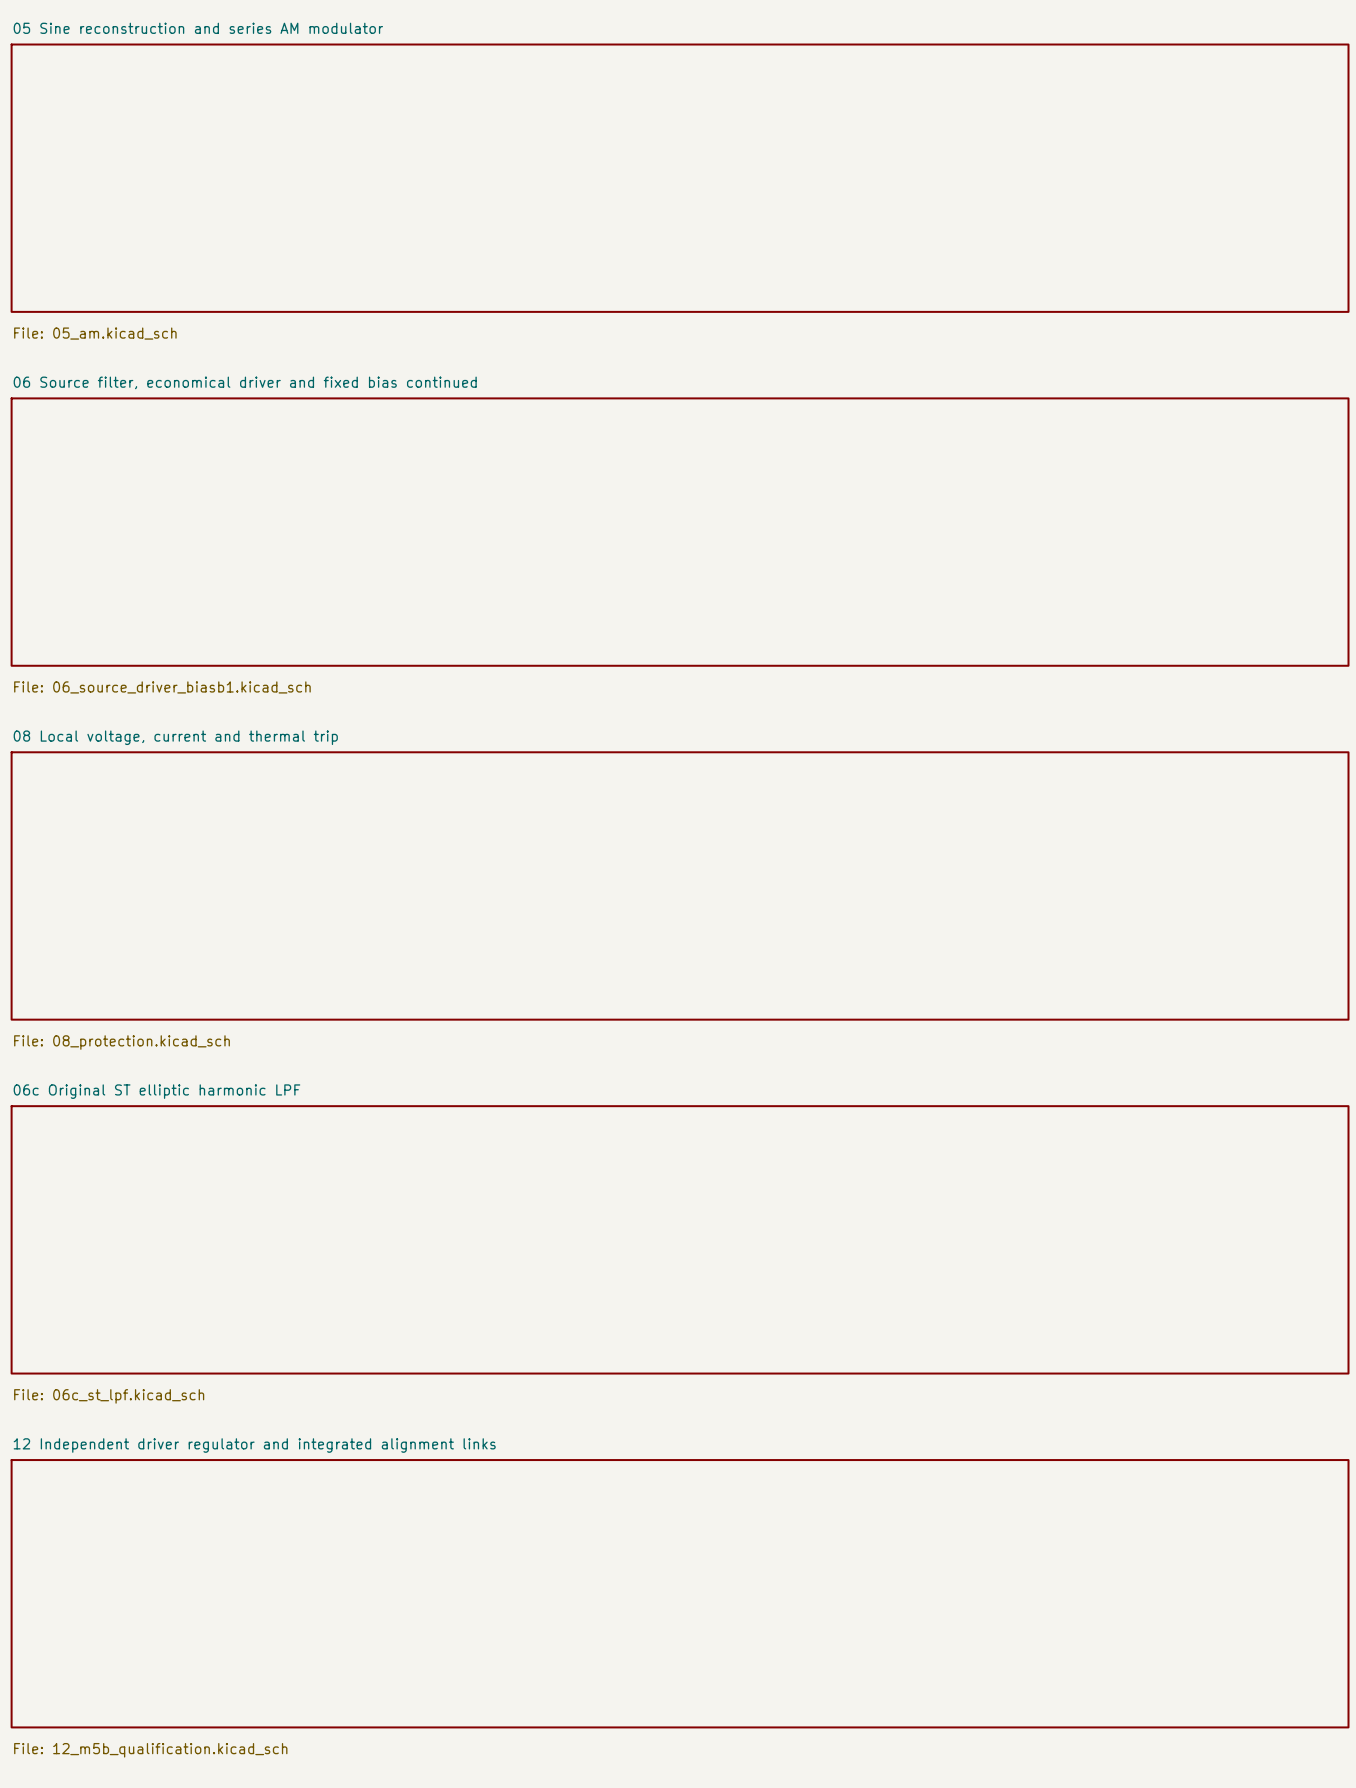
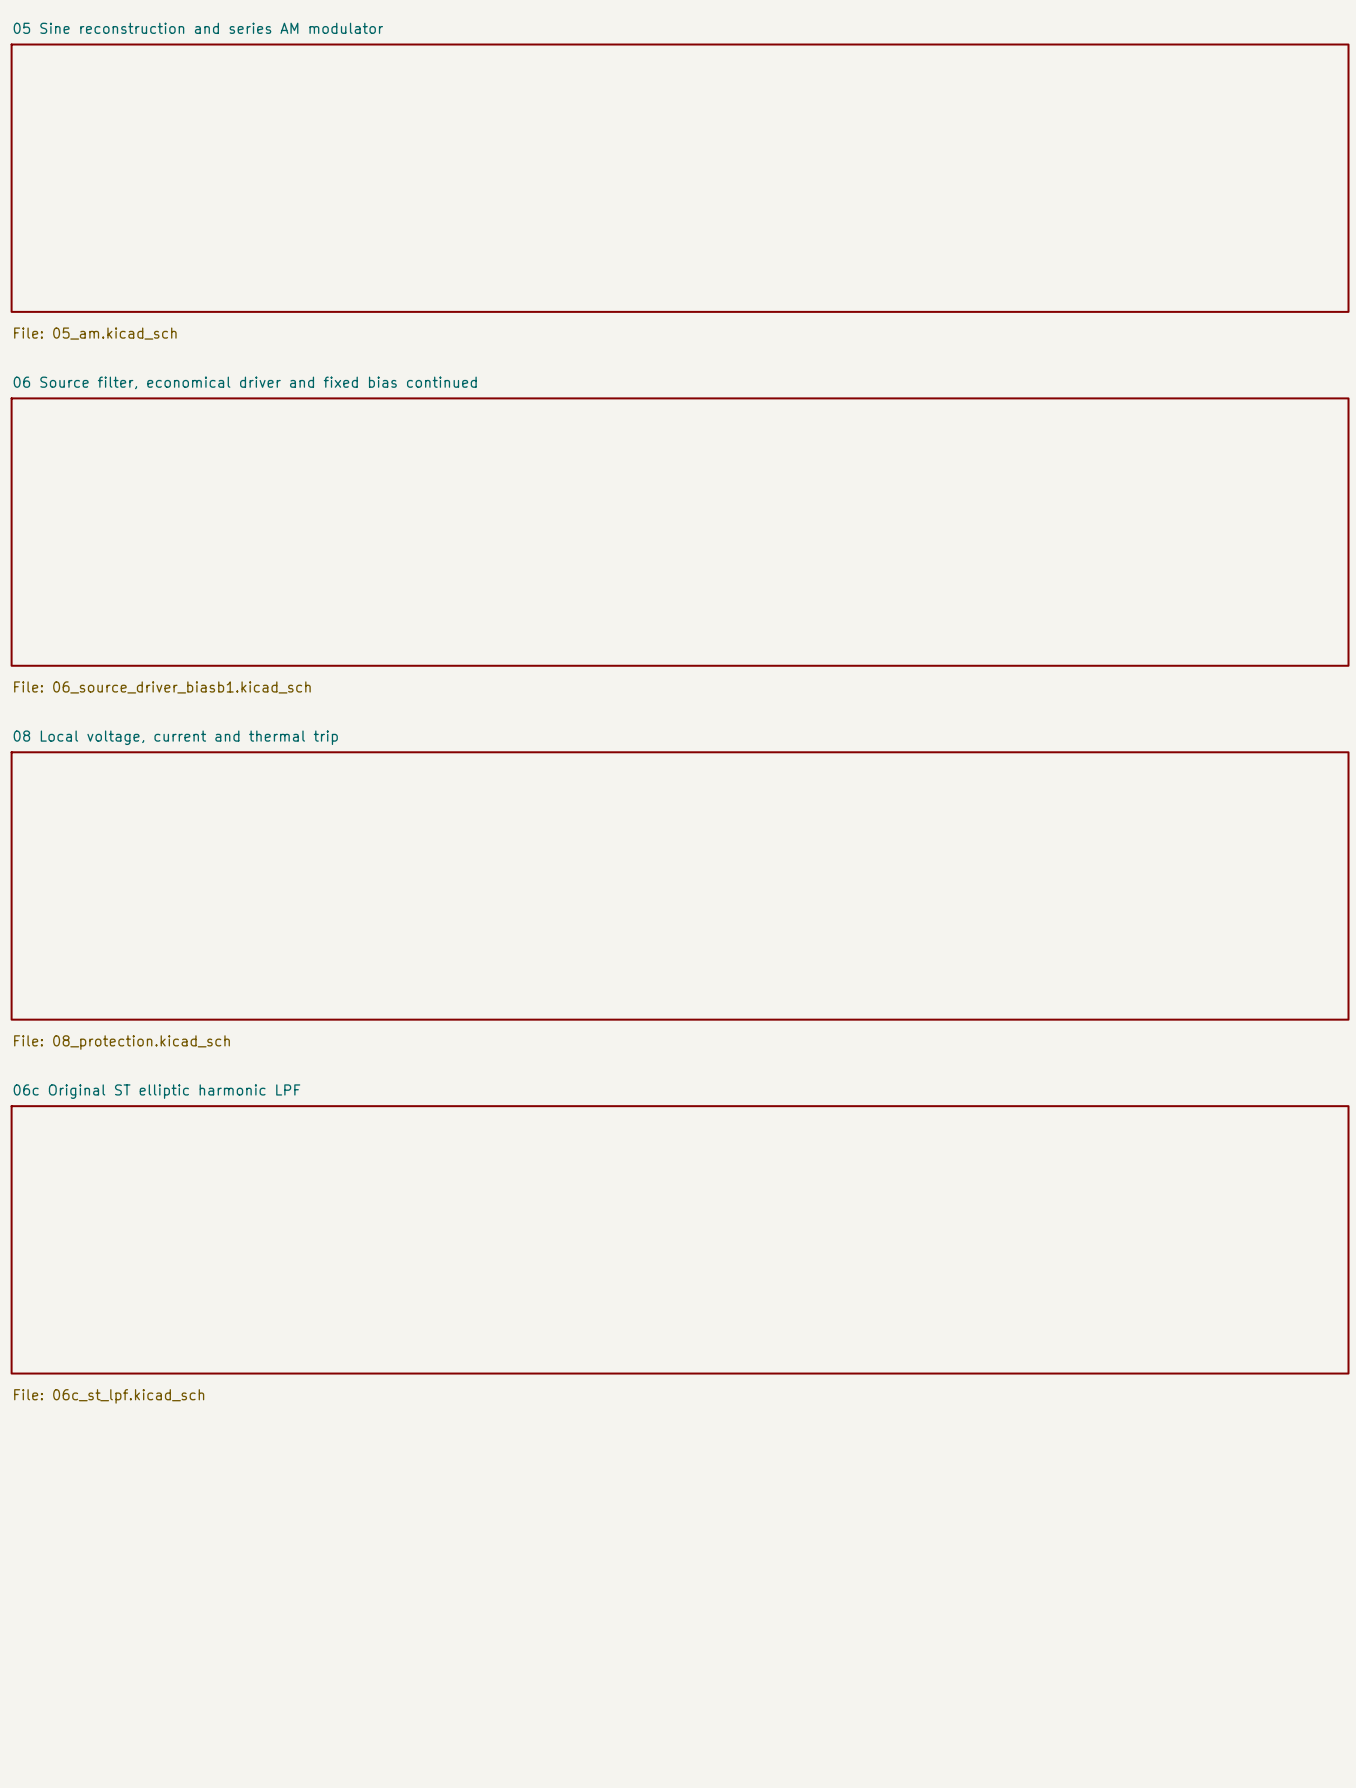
sheet 12 Independent driver regulator and integrated alignment links: File: 12_m5b_qualification.kicad_sch (680, 1593) -> none

